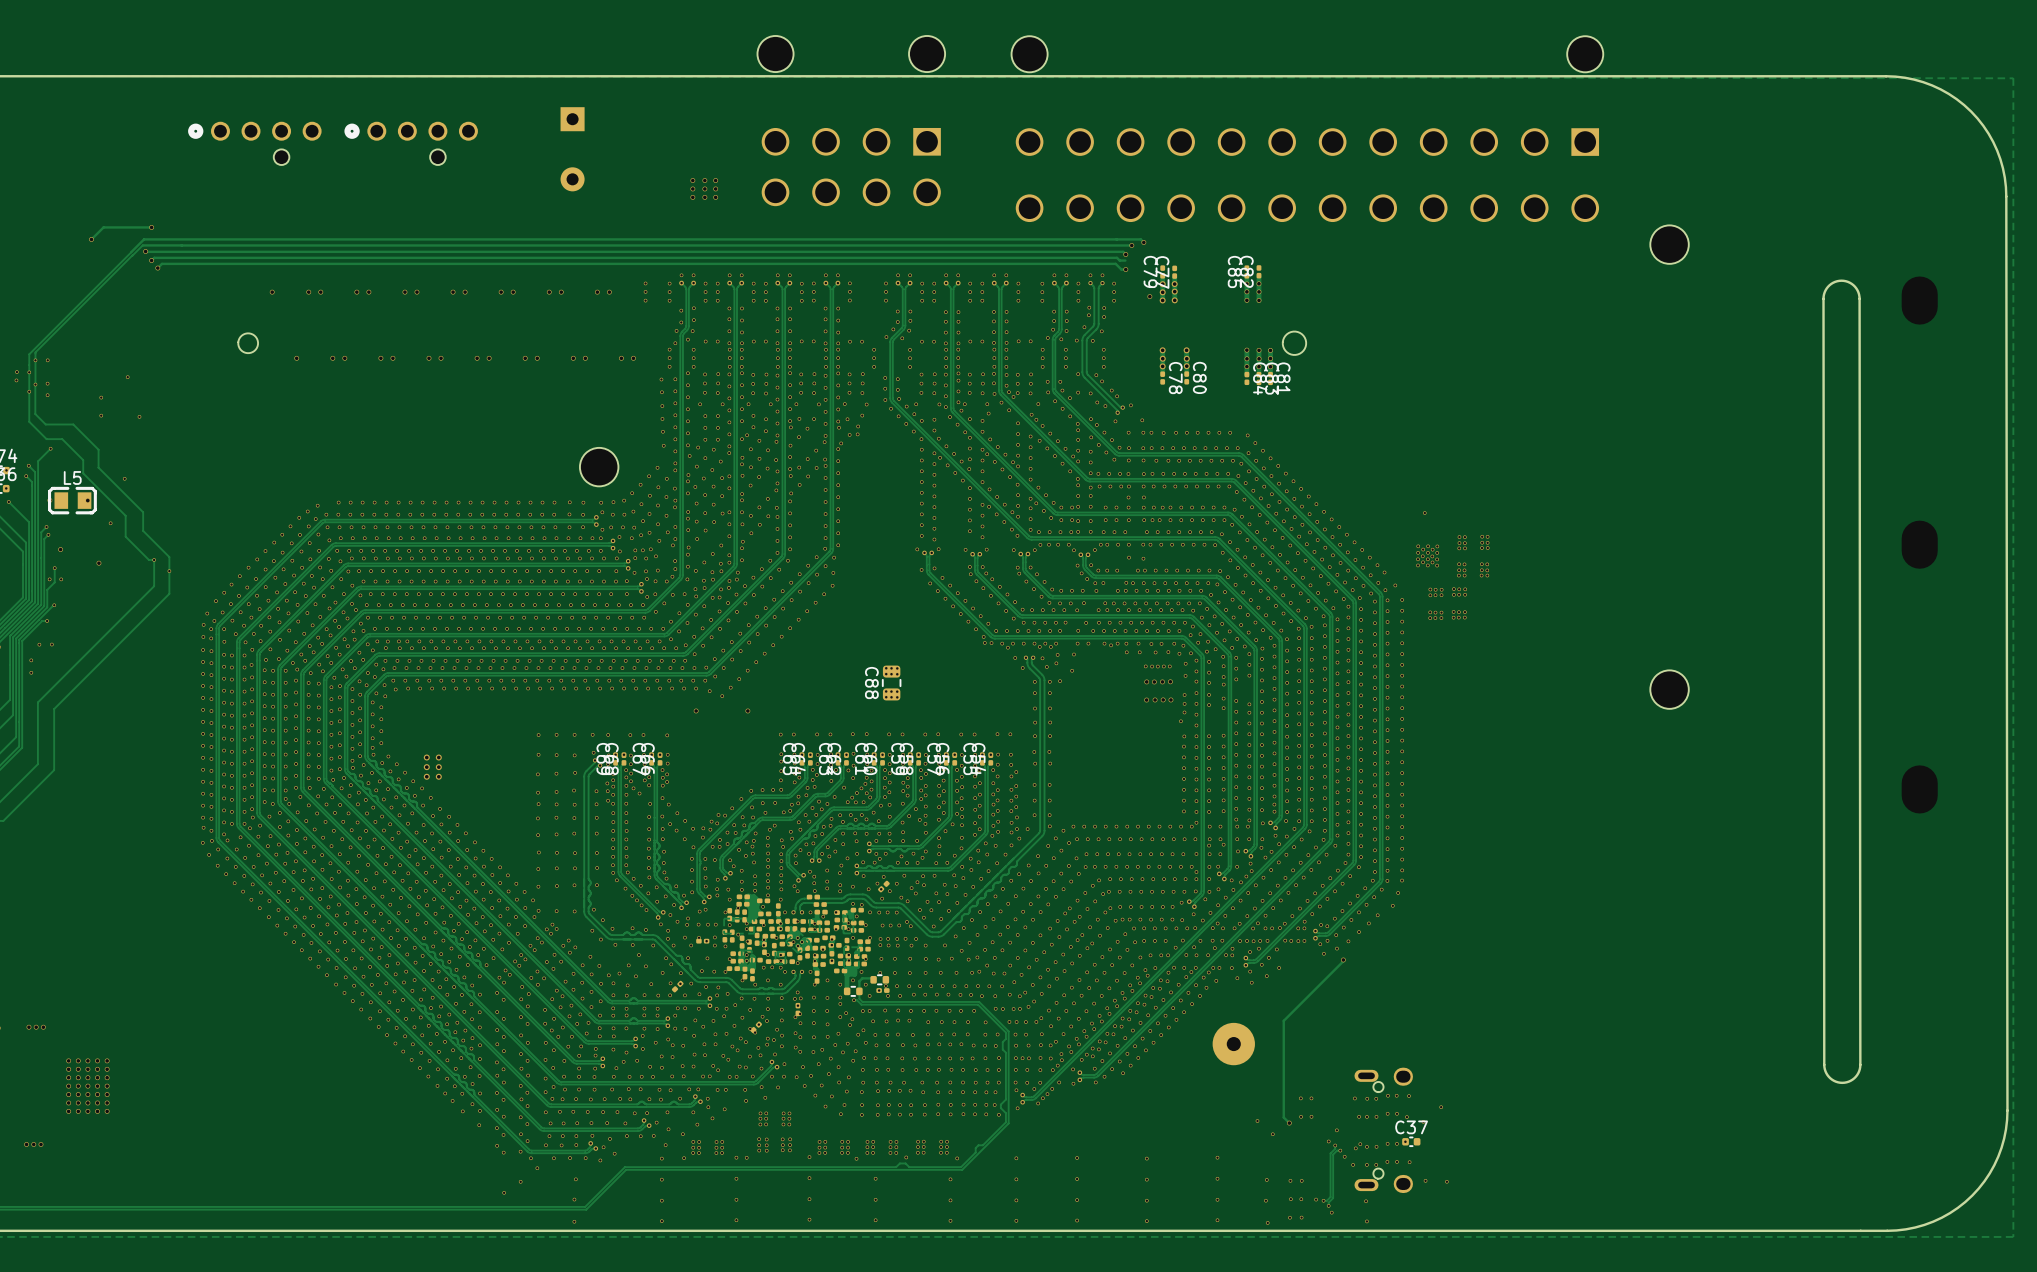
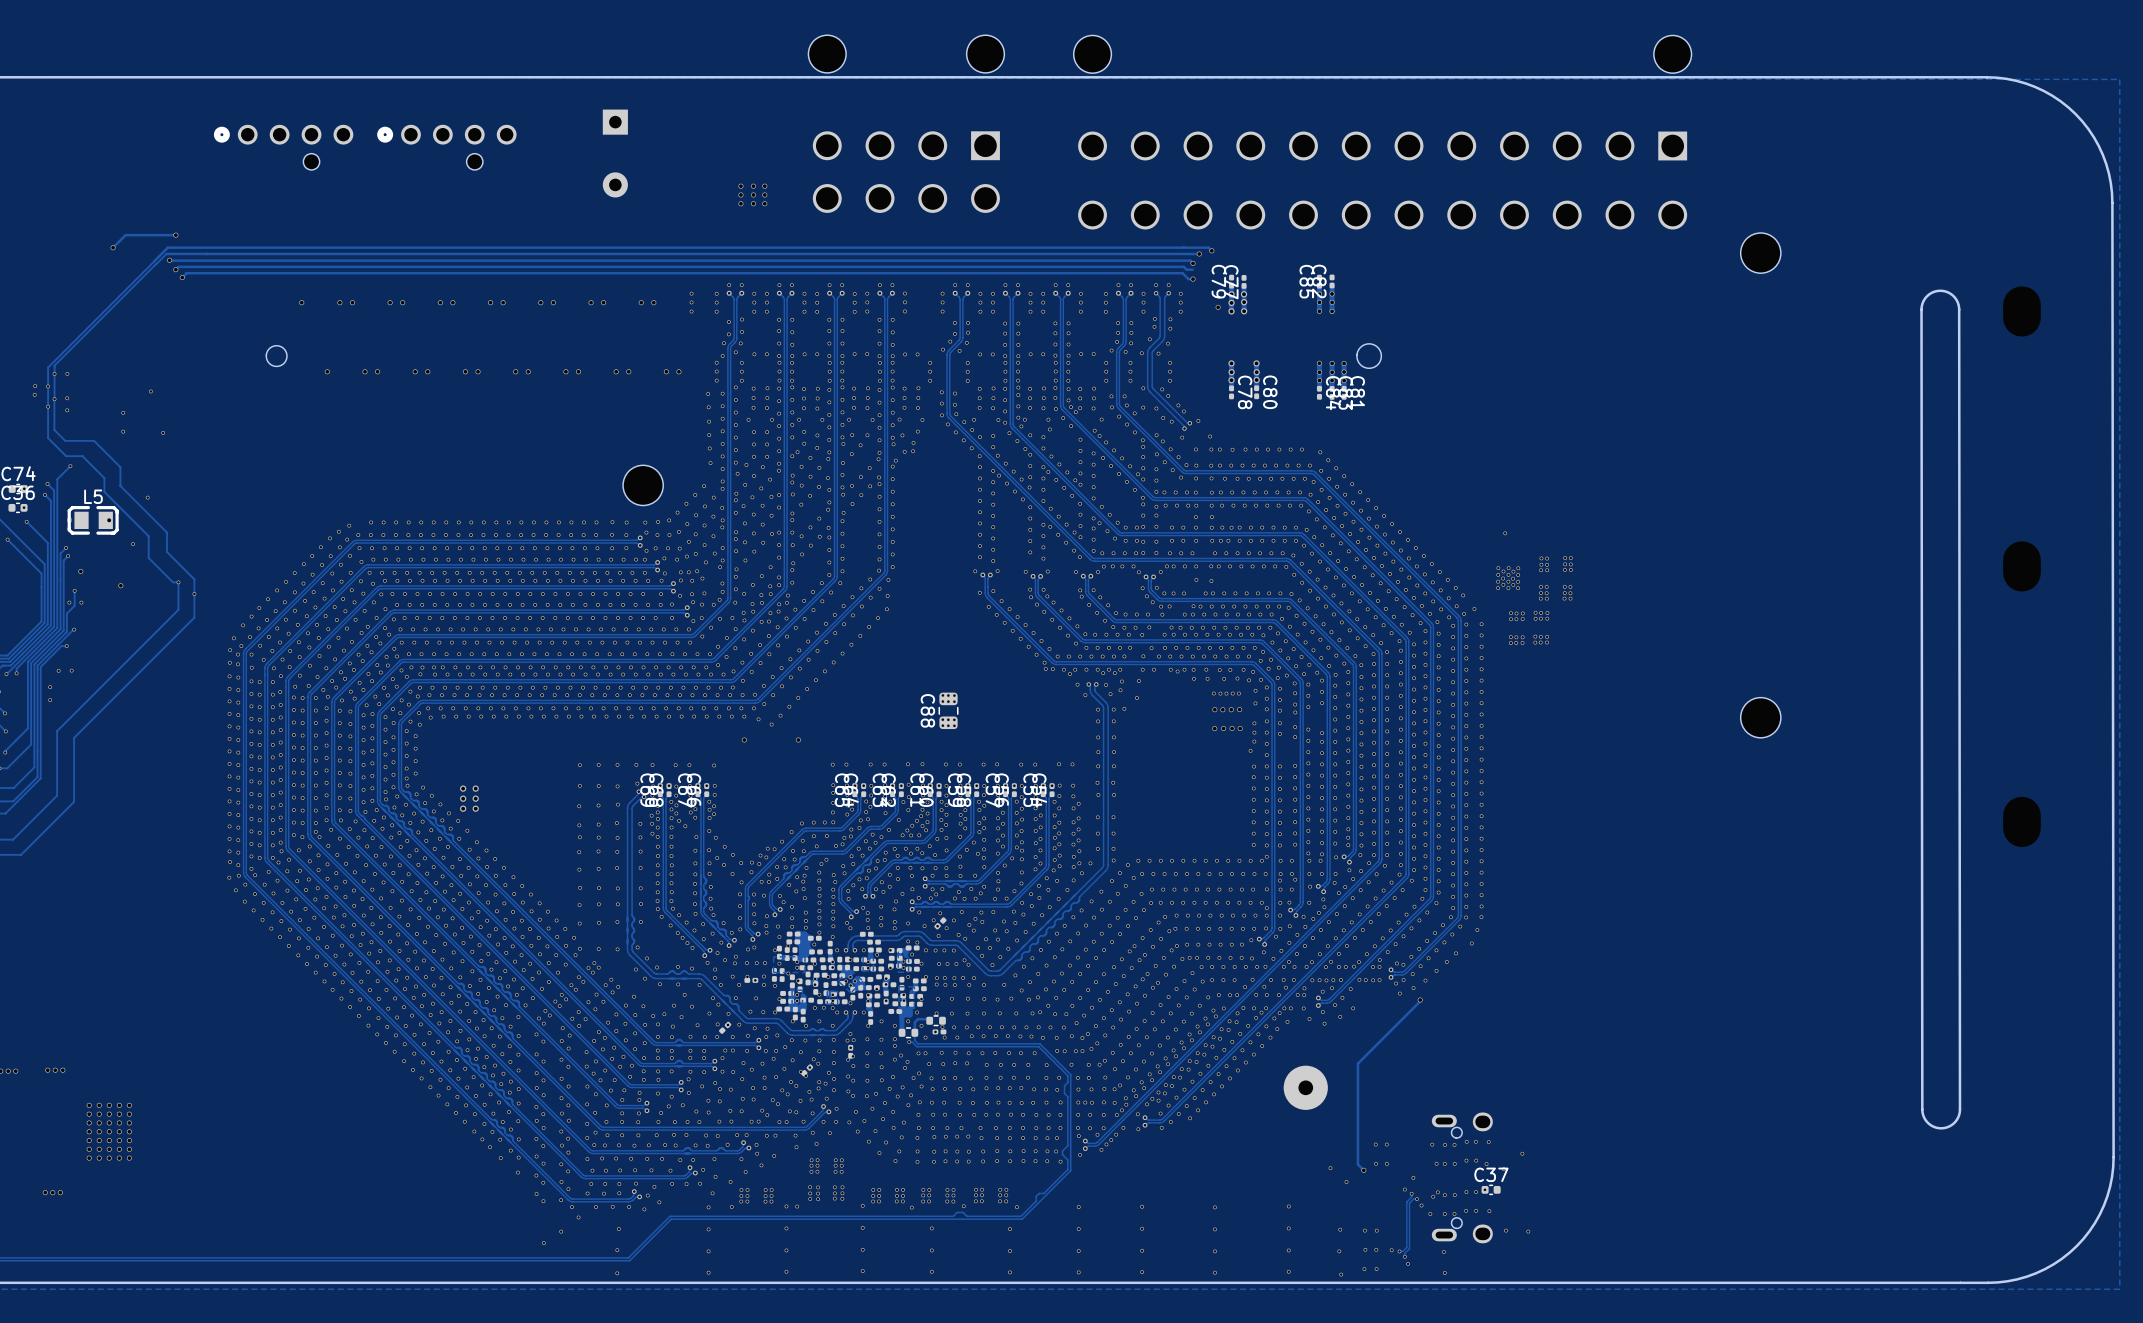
via: (1016, 1022) -> none

